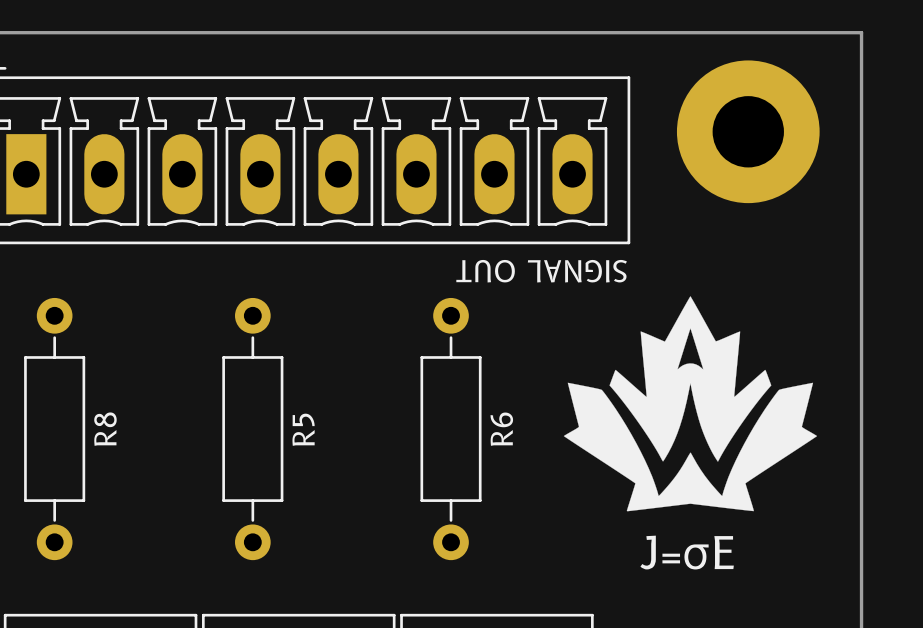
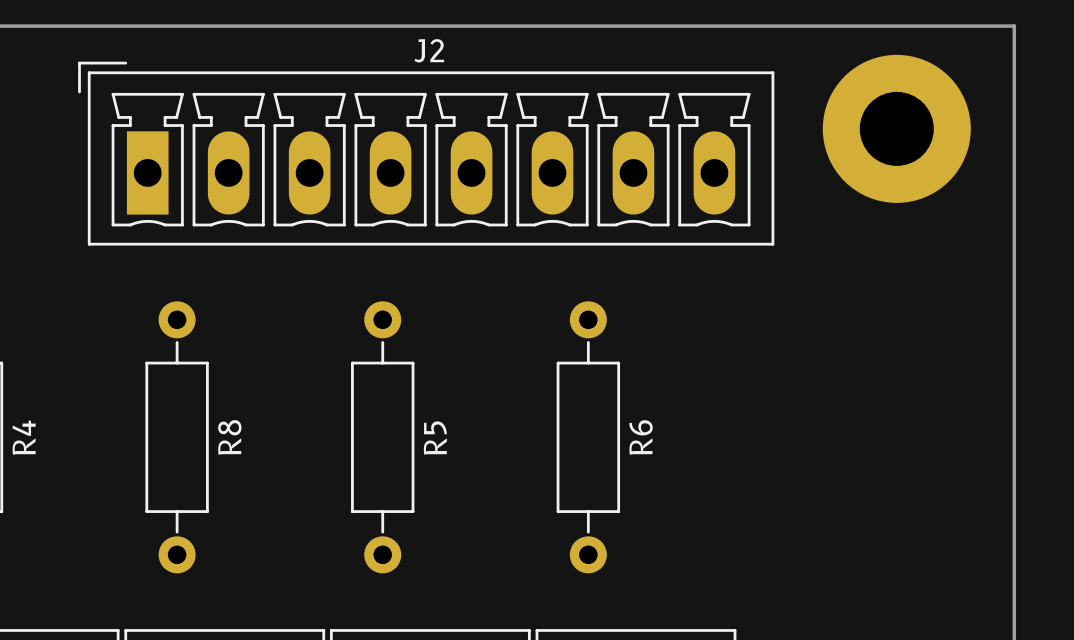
J2 name: none -> J2 (429, 50)
text: SIGNAL OUT (541, 271) -> none
drawing: [563, 296, 818, 512] -> none
text: J=σE (687, 552) -> none

